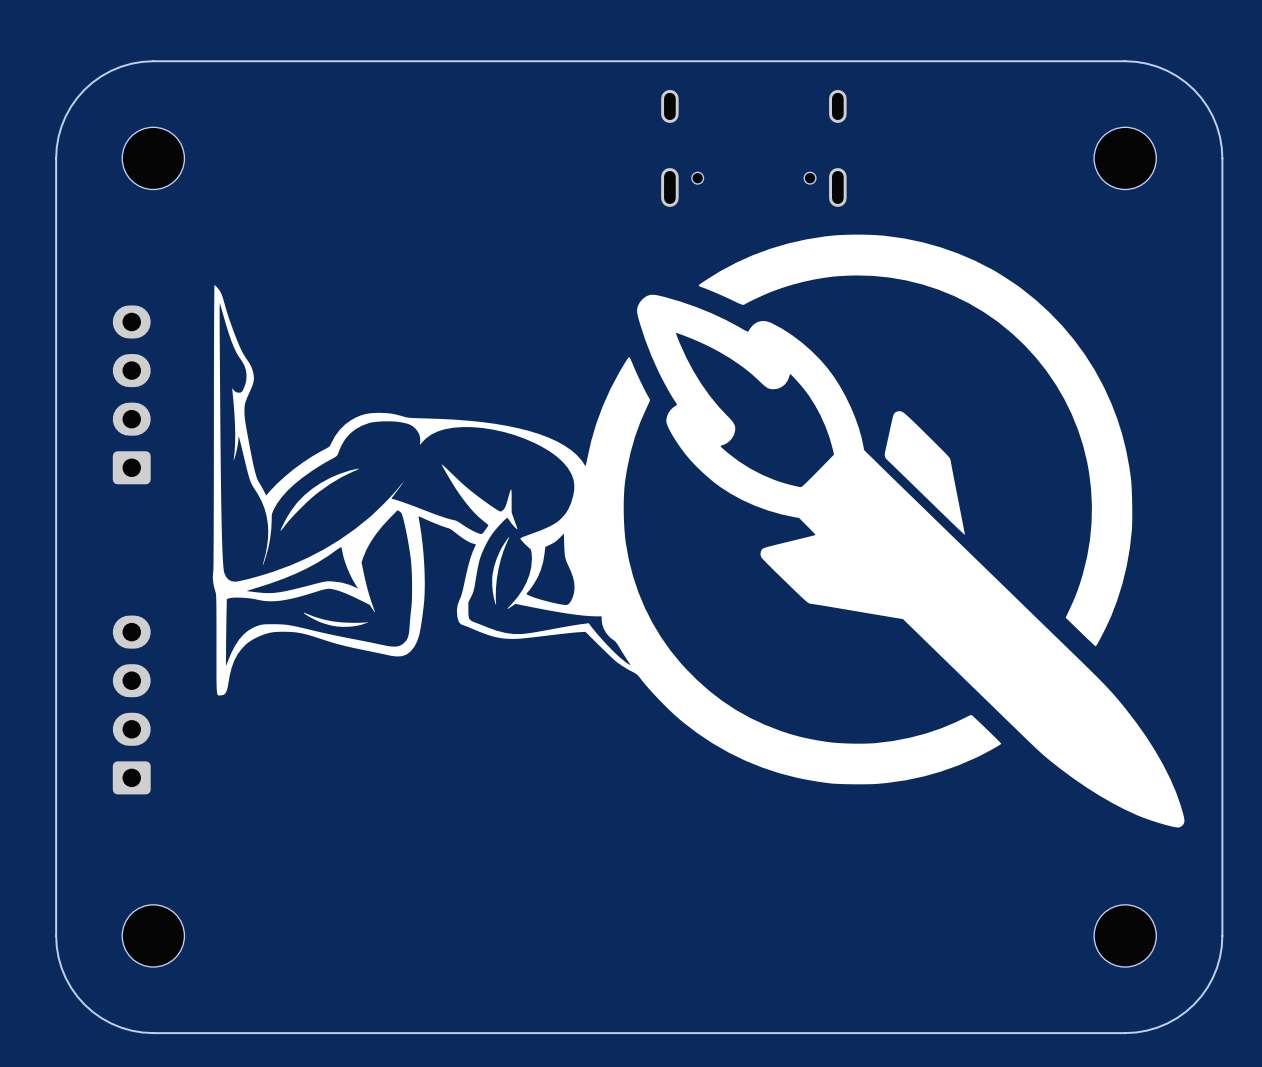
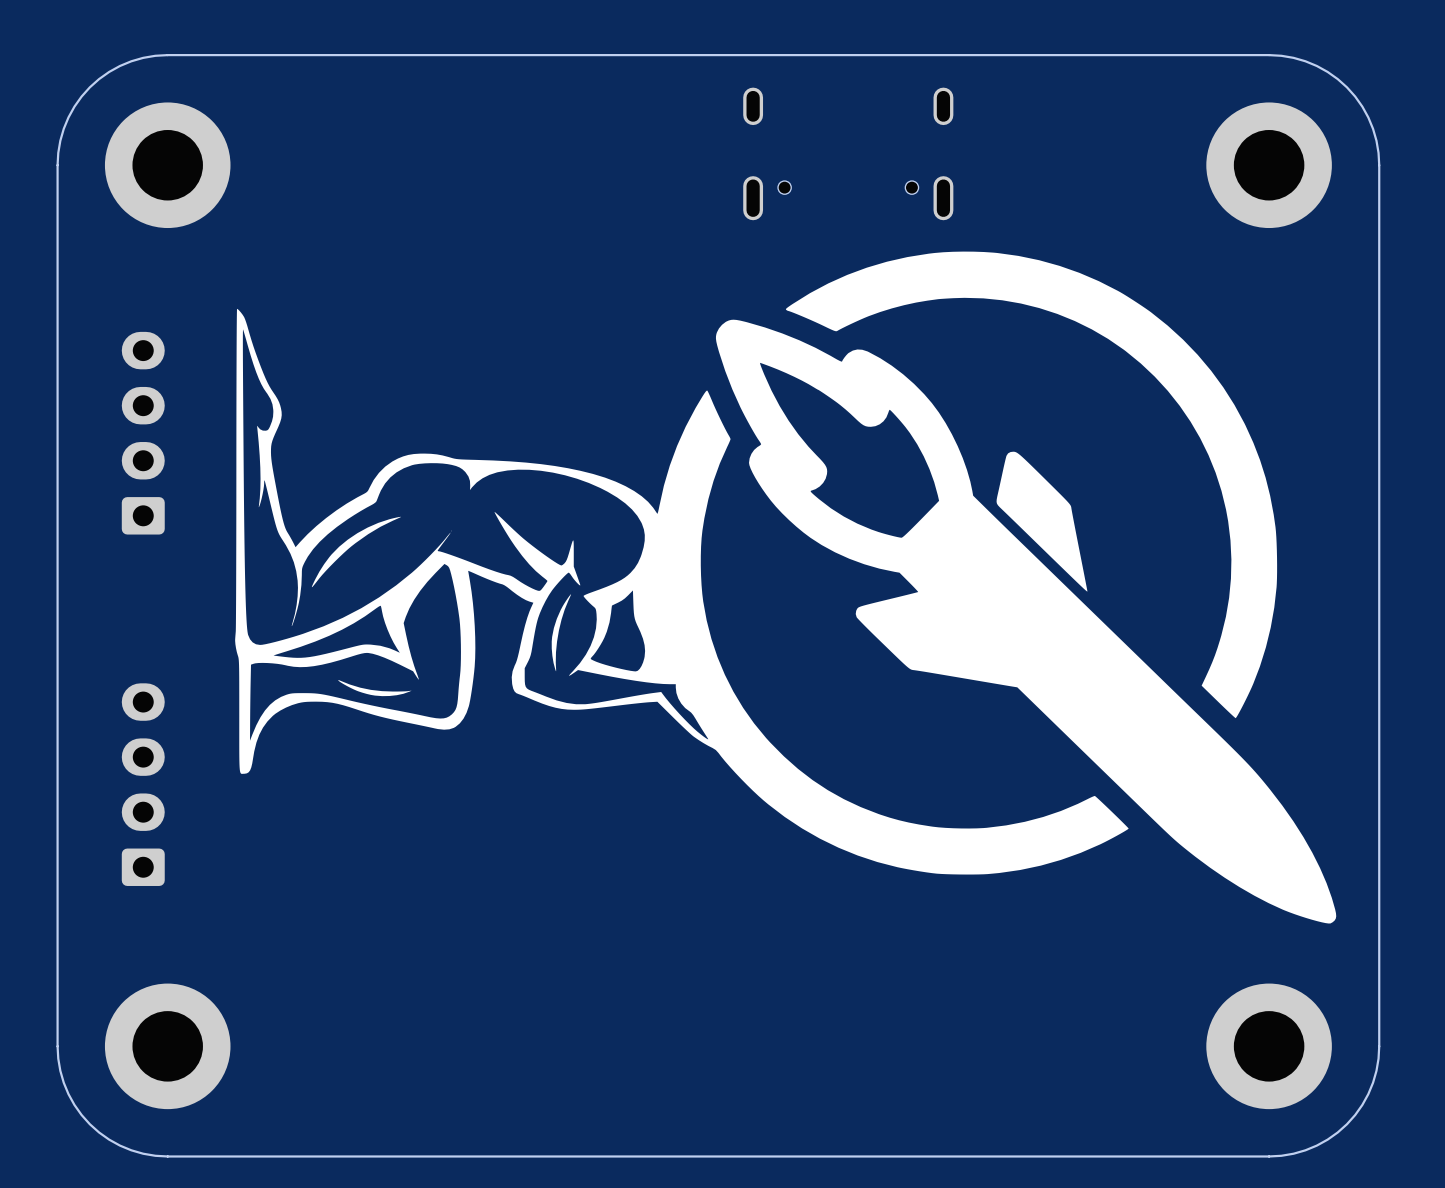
part footprint: [122, 127, 185, 190] -> [104, 102, 231, 229]
part footprint: [1094, 127, 1157, 190] -> [1206, 102, 1332, 229]
part footprint: [122, 904, 185, 968] -> [104, 983, 231, 1110]
part footprint: [1094, 904, 1157, 968] -> [1206, 983, 1332, 1110]

